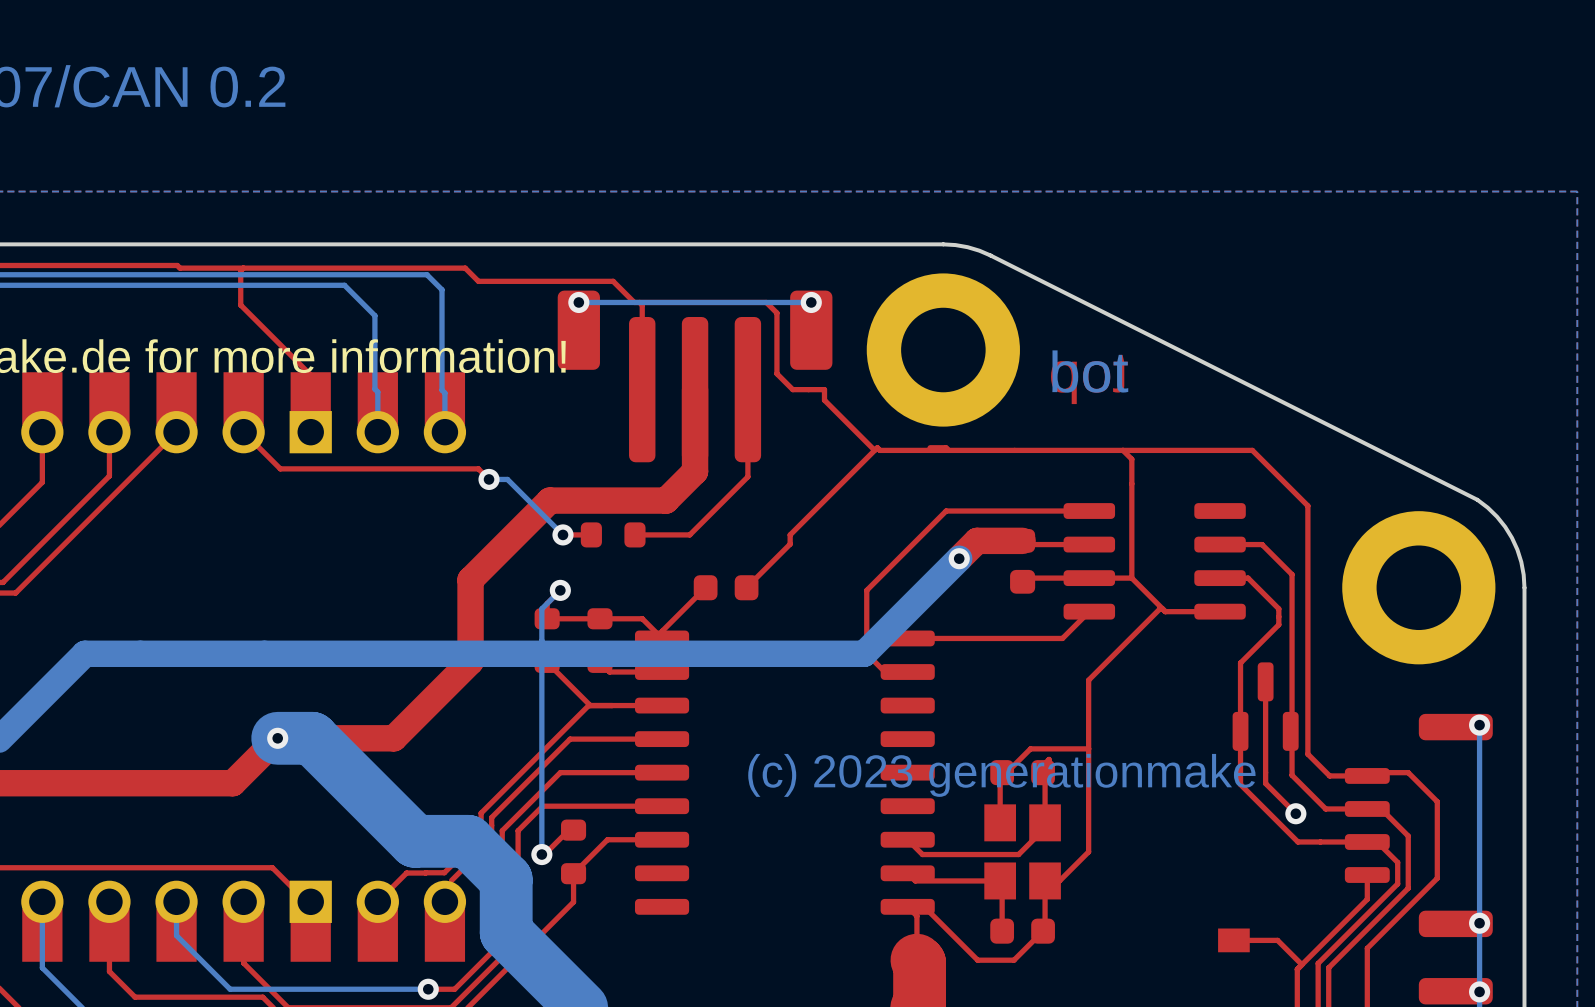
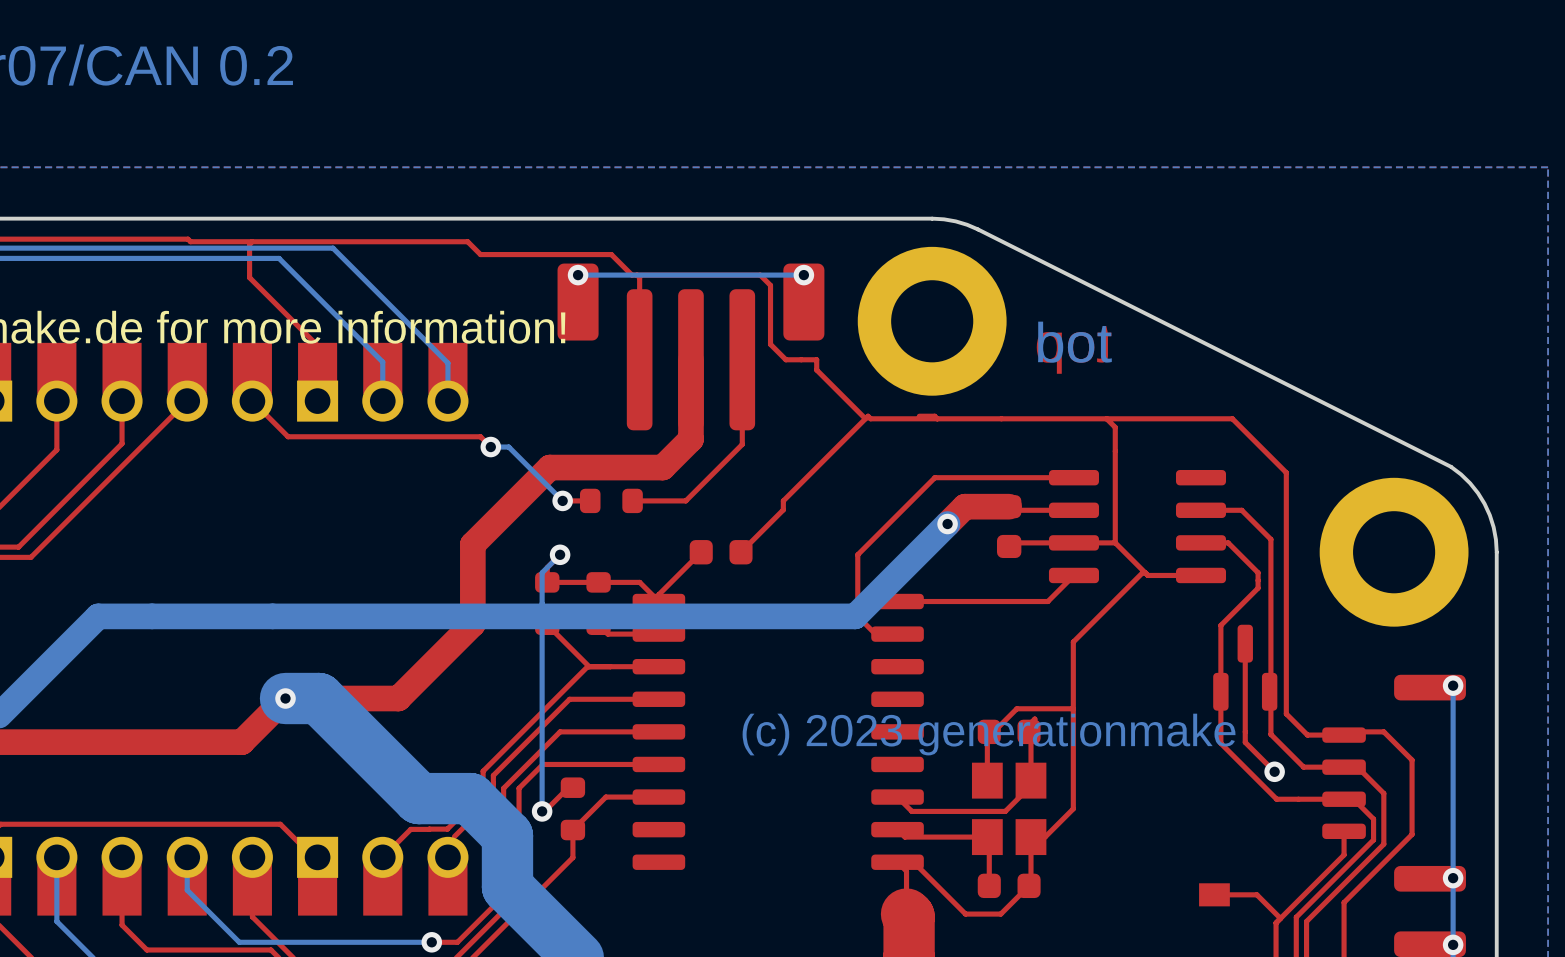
bottom track: (326, 274) (426, 274) (442, 289) (442, 390) -> (332, 248) (445, 360)
bottom track: (271, 285) (344, 285) (374, 315) (374, 389) -> (279, 258) (379, 359)

